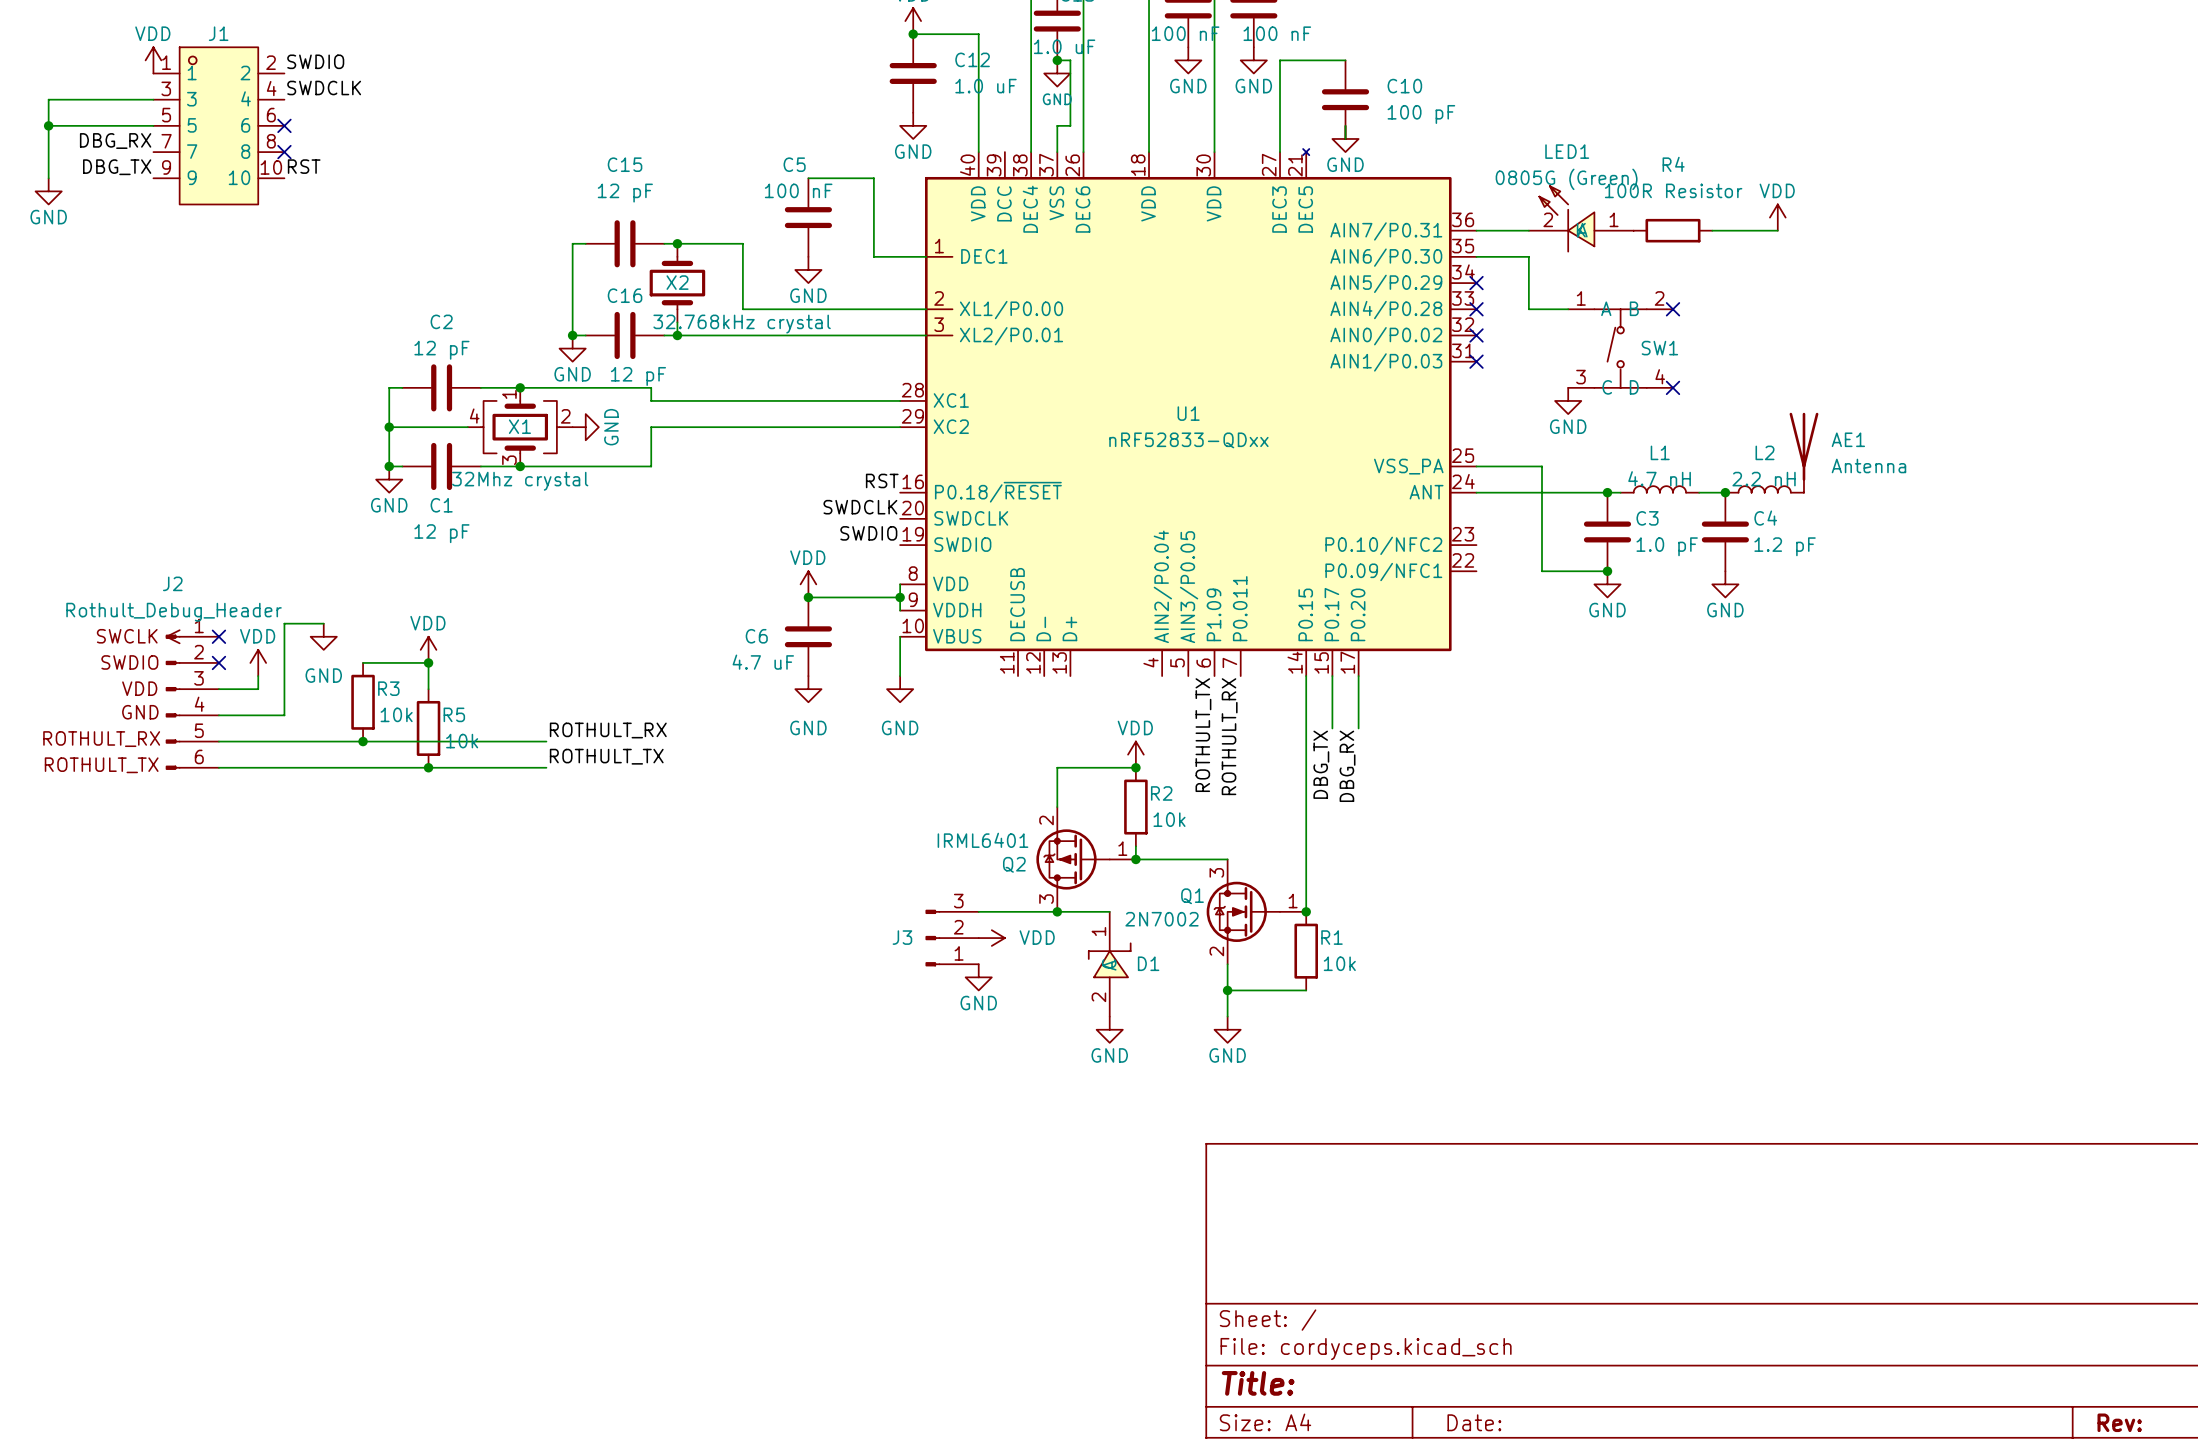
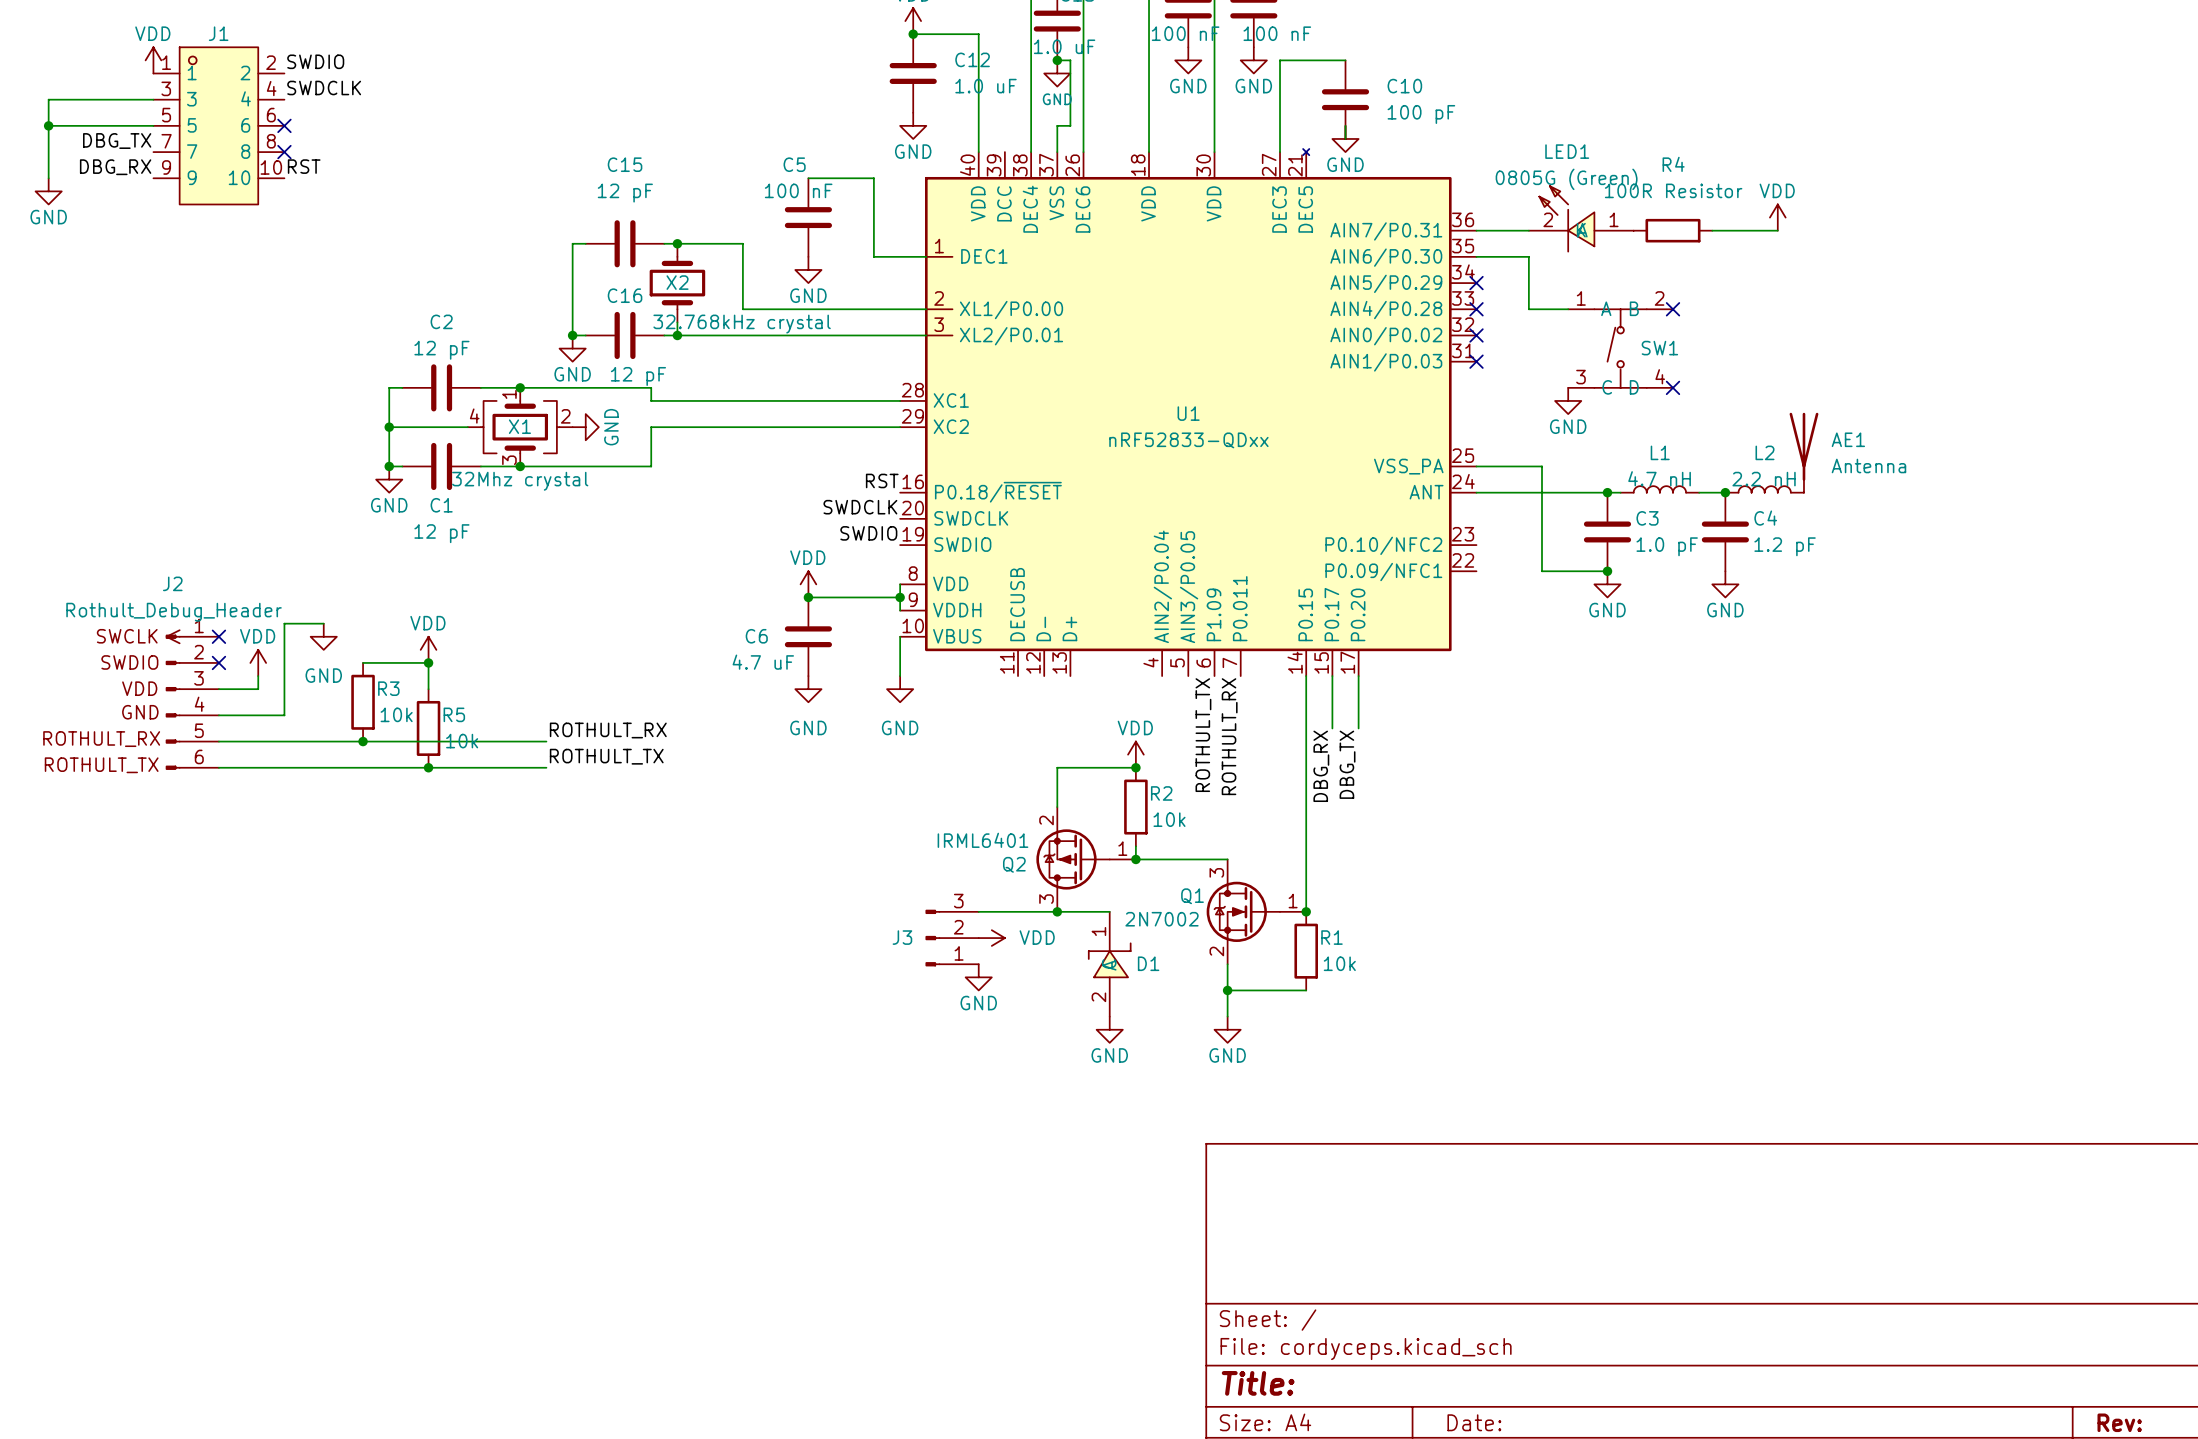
label: DBG_RX (115, 141) -> DBG_TX (117, 141)
label: DBG_TX (117, 167) -> DBG_RX (115, 167)
label: DBG_TX (1321, 764) -> DBG_RX (1321, 766)
label: DBG_RX (1347, 766) -> DBG_TX (1347, 764)

